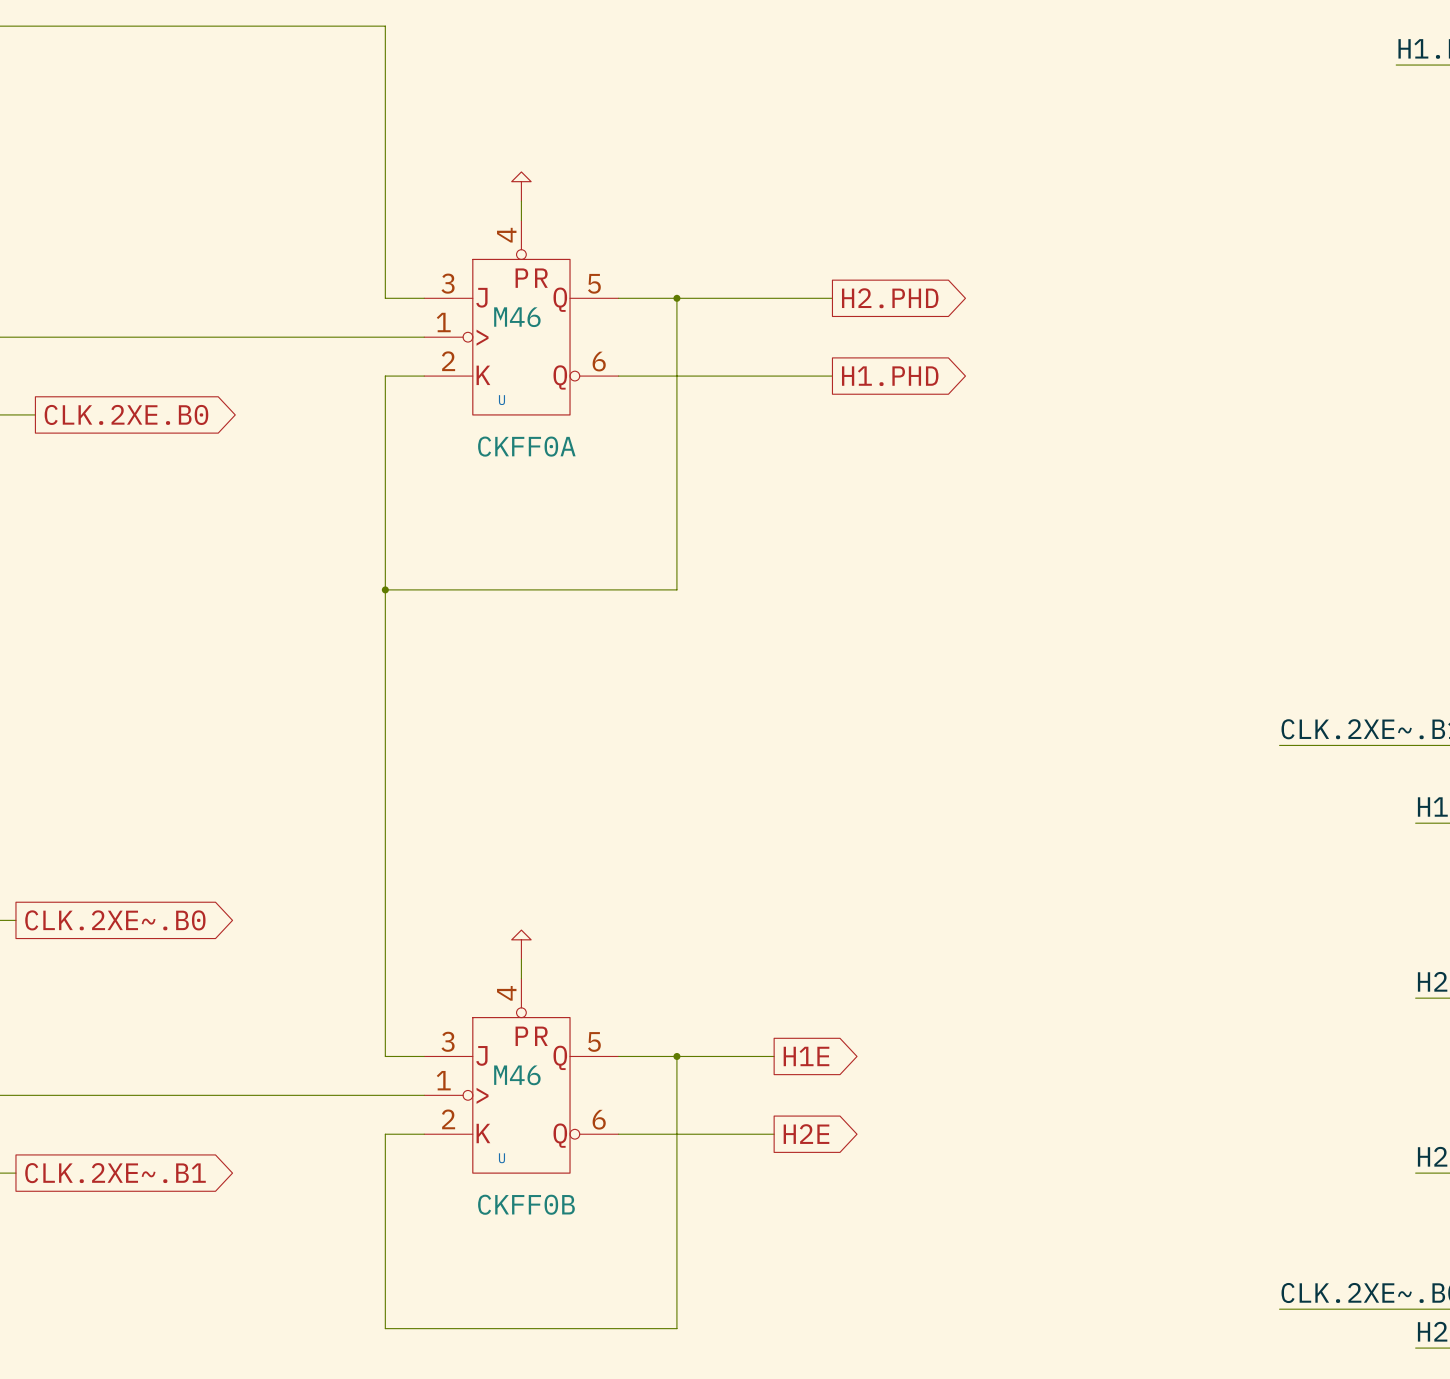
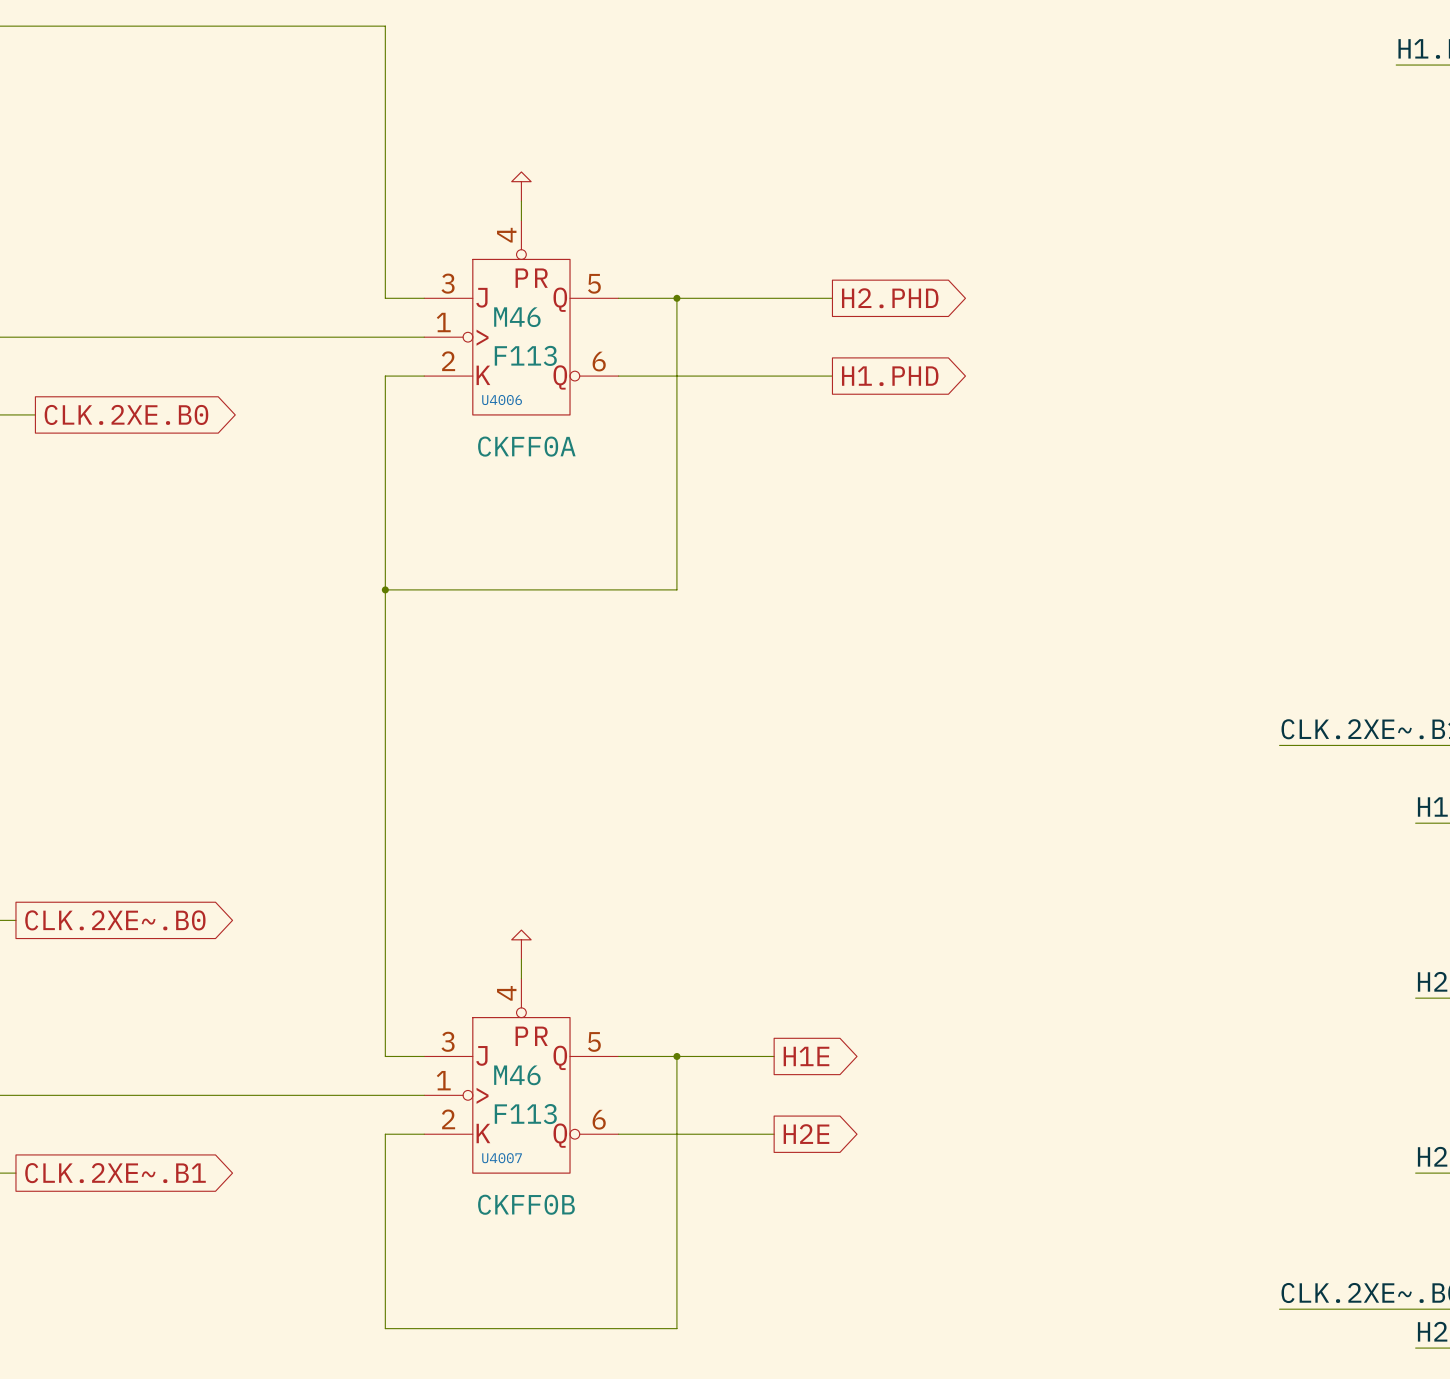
U value: none -> F113 (525, 355)
U name: U (501, 400) -> U4006 (502, 400)
U value: none -> F113 (525, 1114)
U name: U (501, 1158) -> U4007 (502, 1158)

